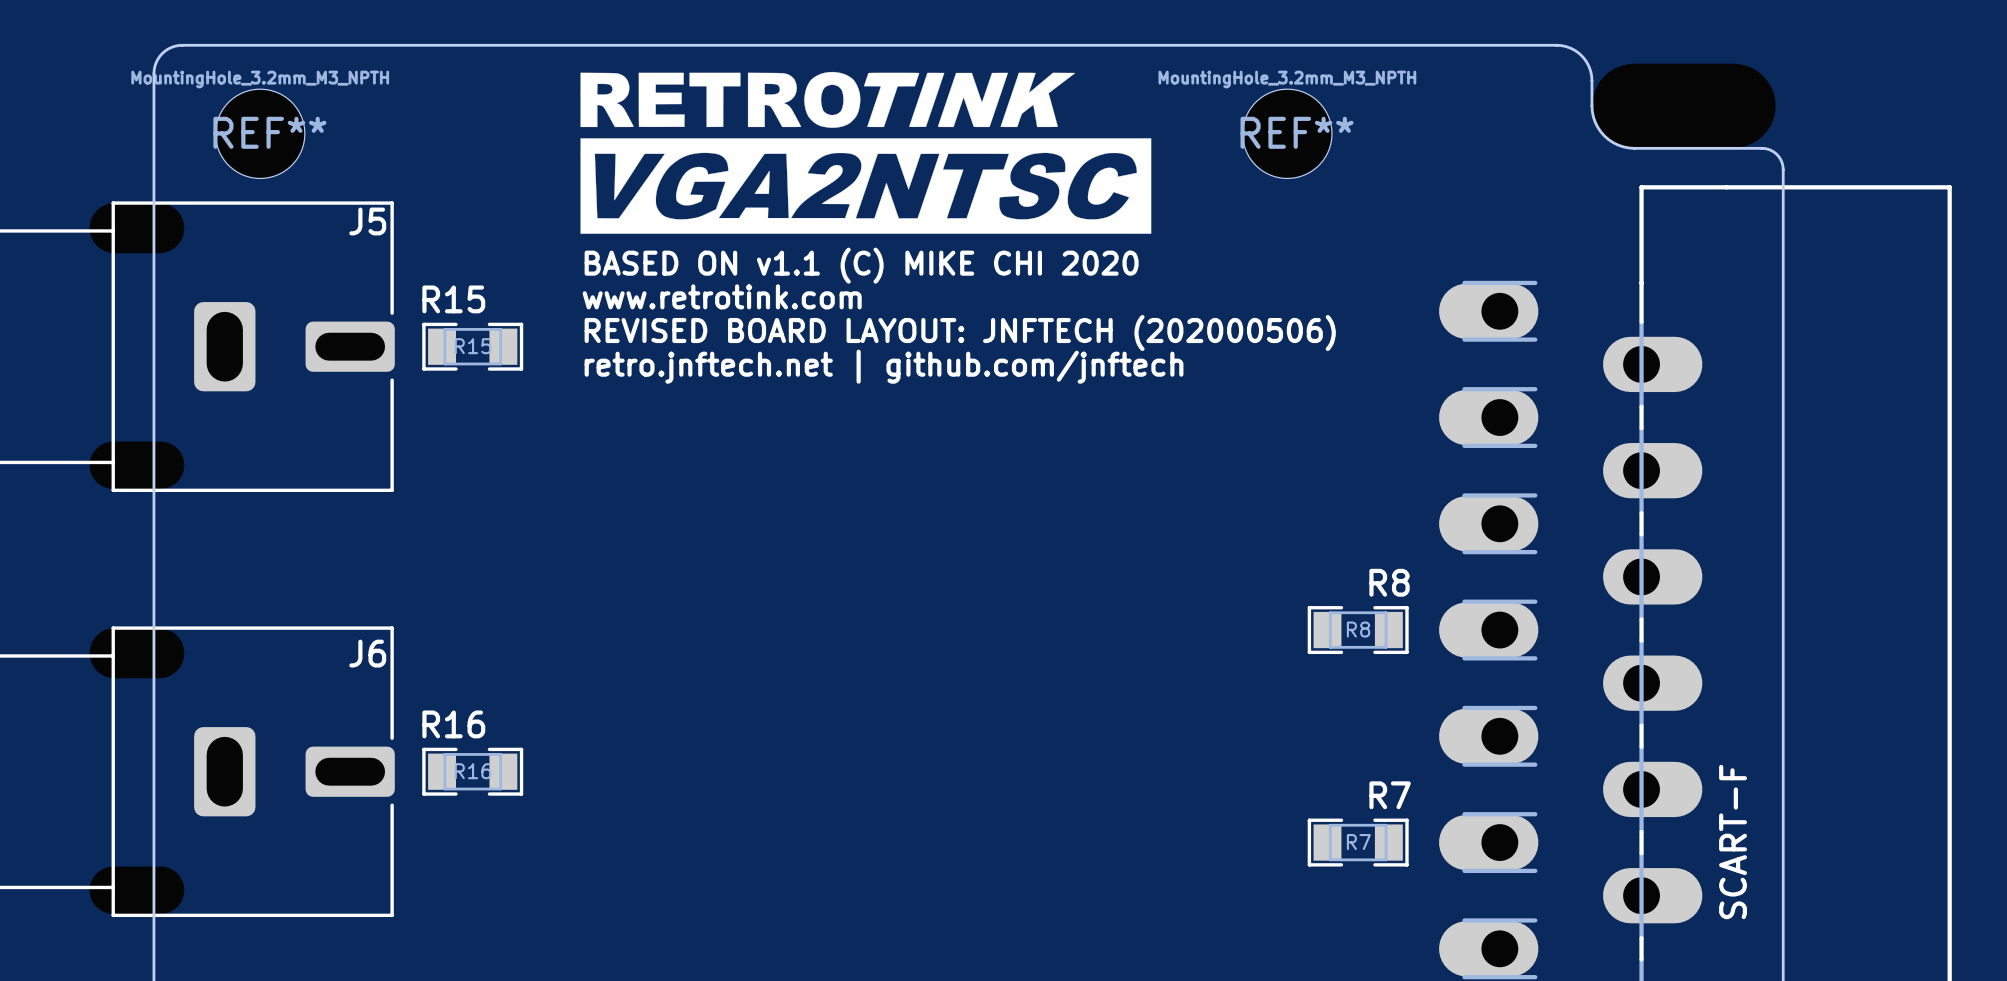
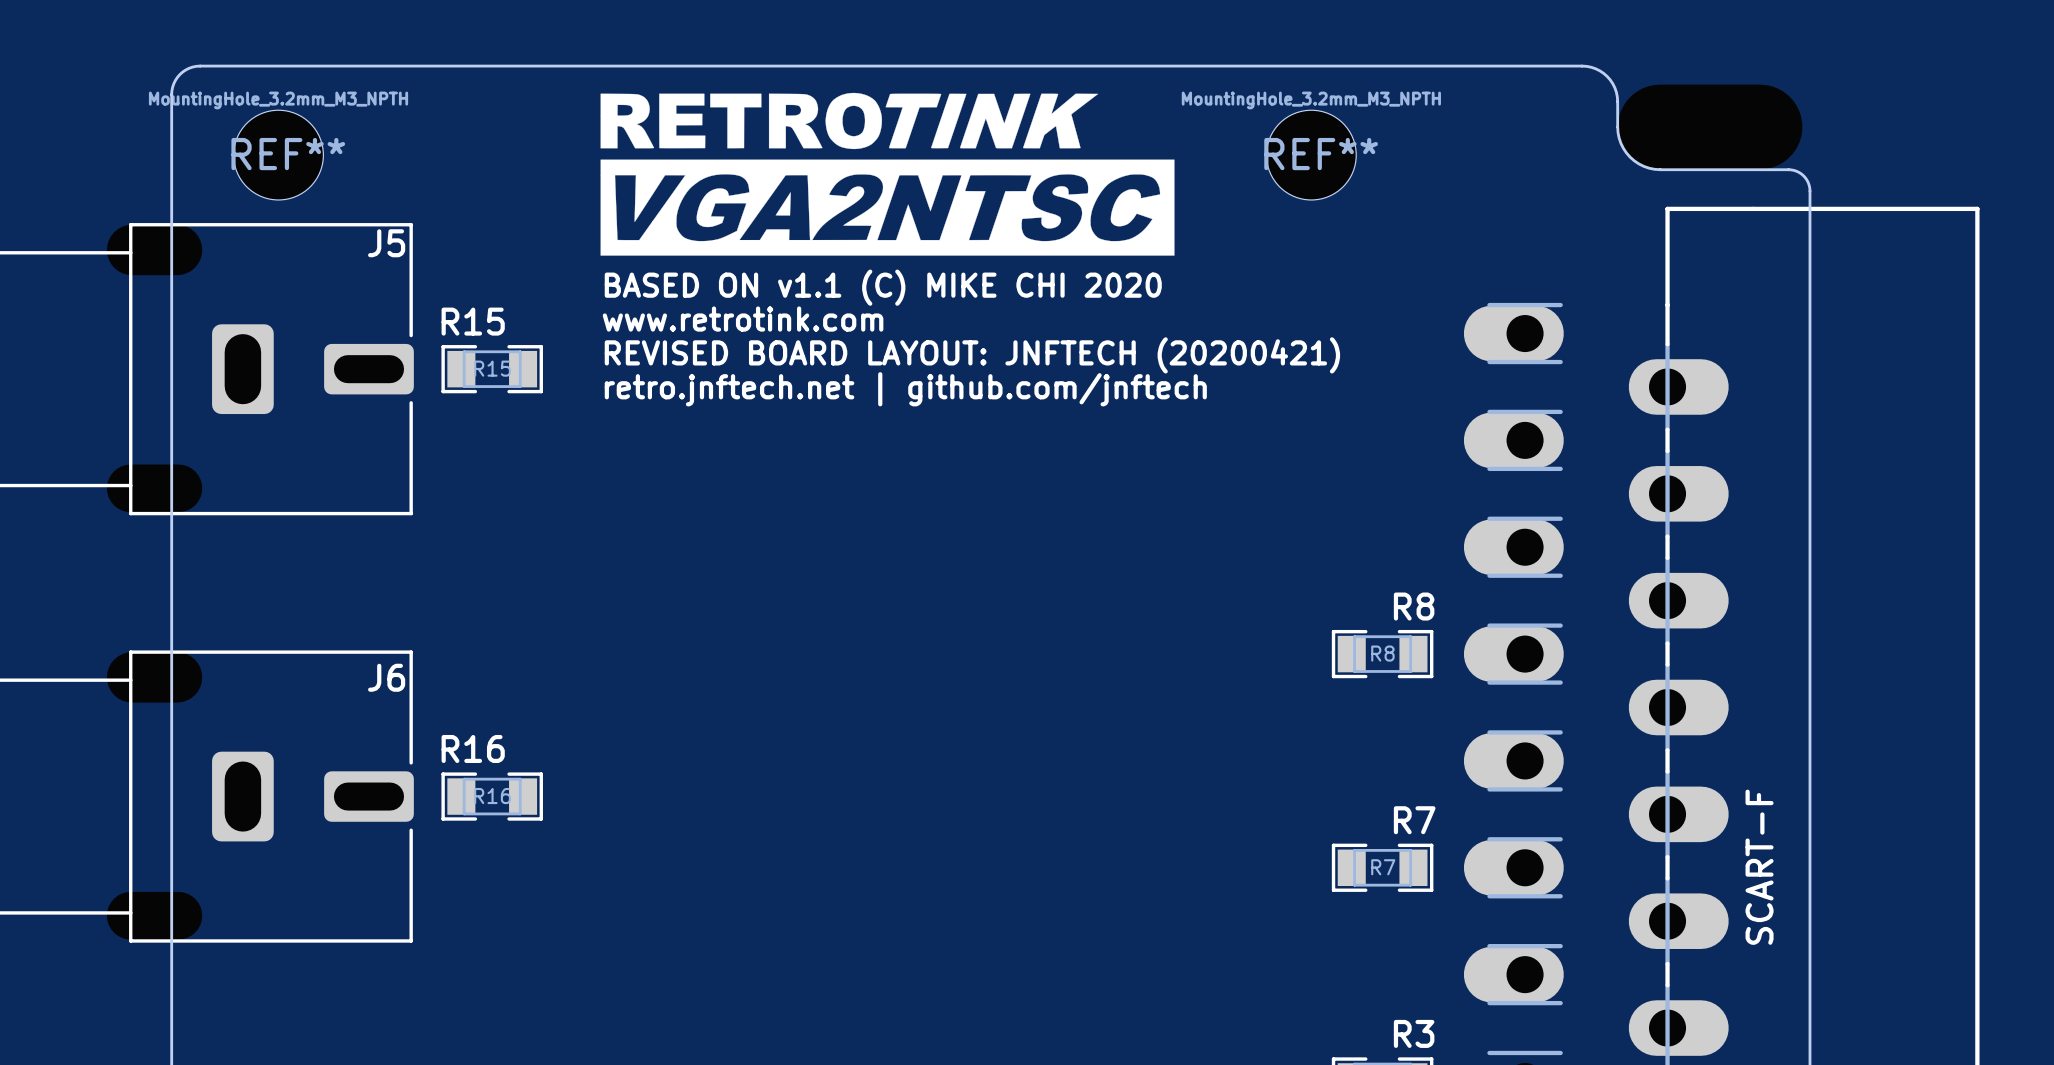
text: REVISED BOARD LAYOUT: JNFTECH (202000506) (960, 333) -> REVISED BOARD LAYOUT: JNFTECH (20200421) (972, 355)

